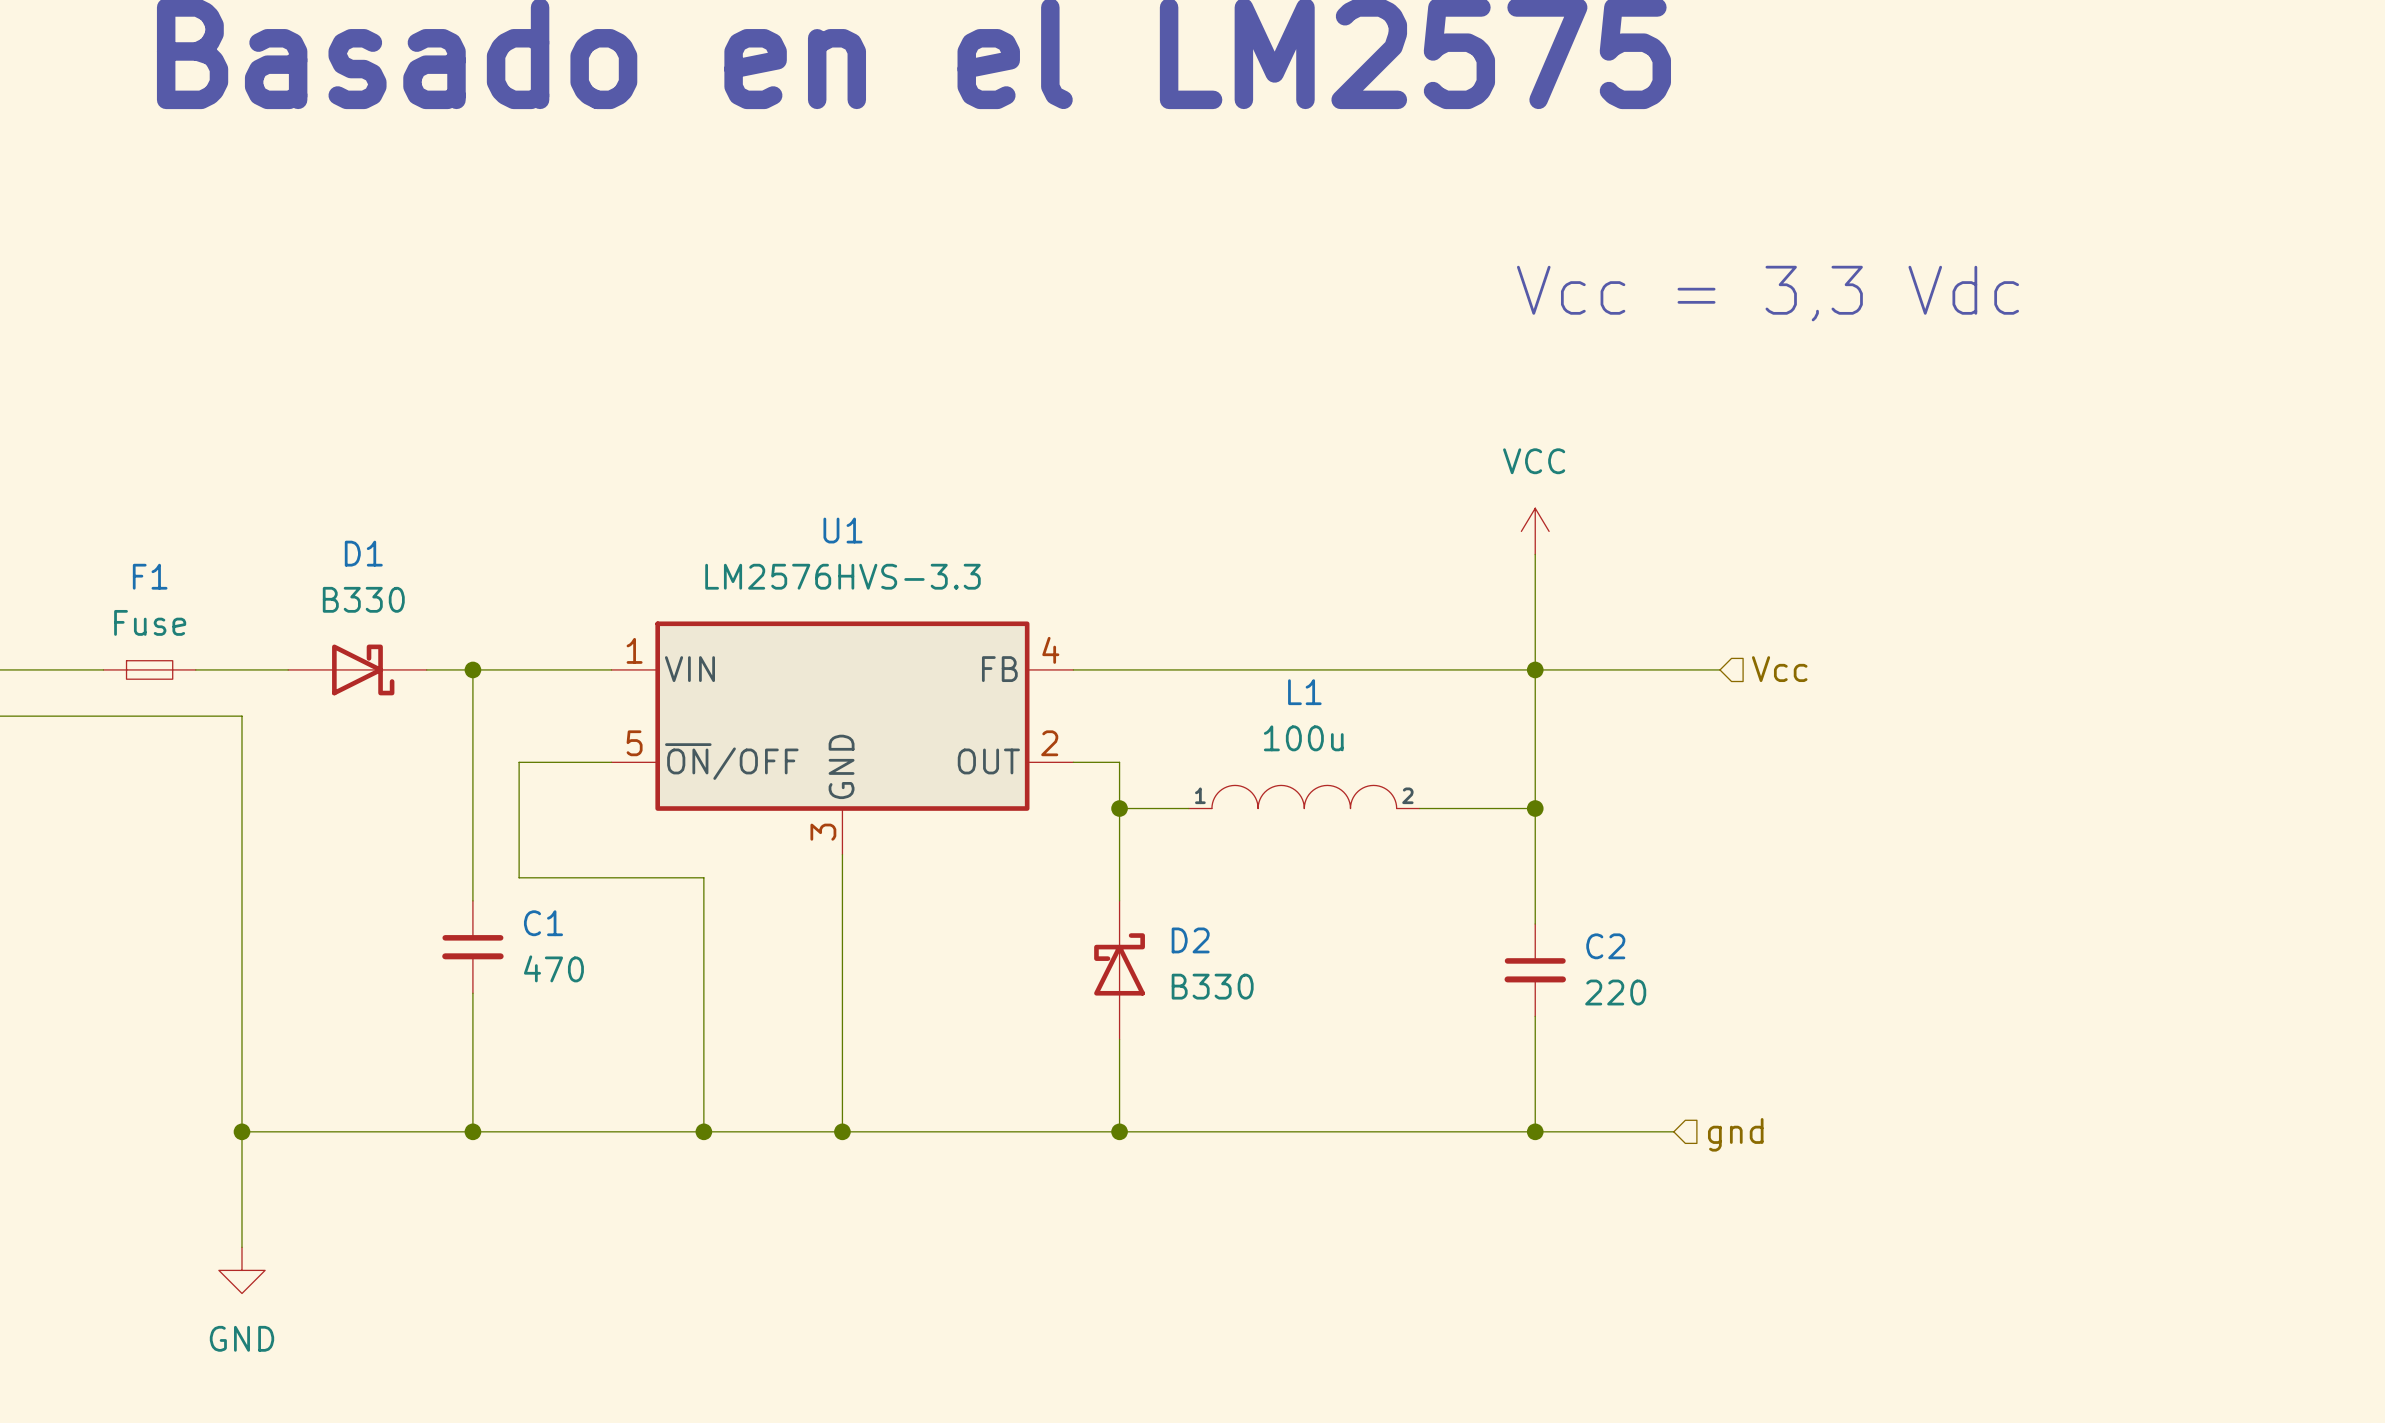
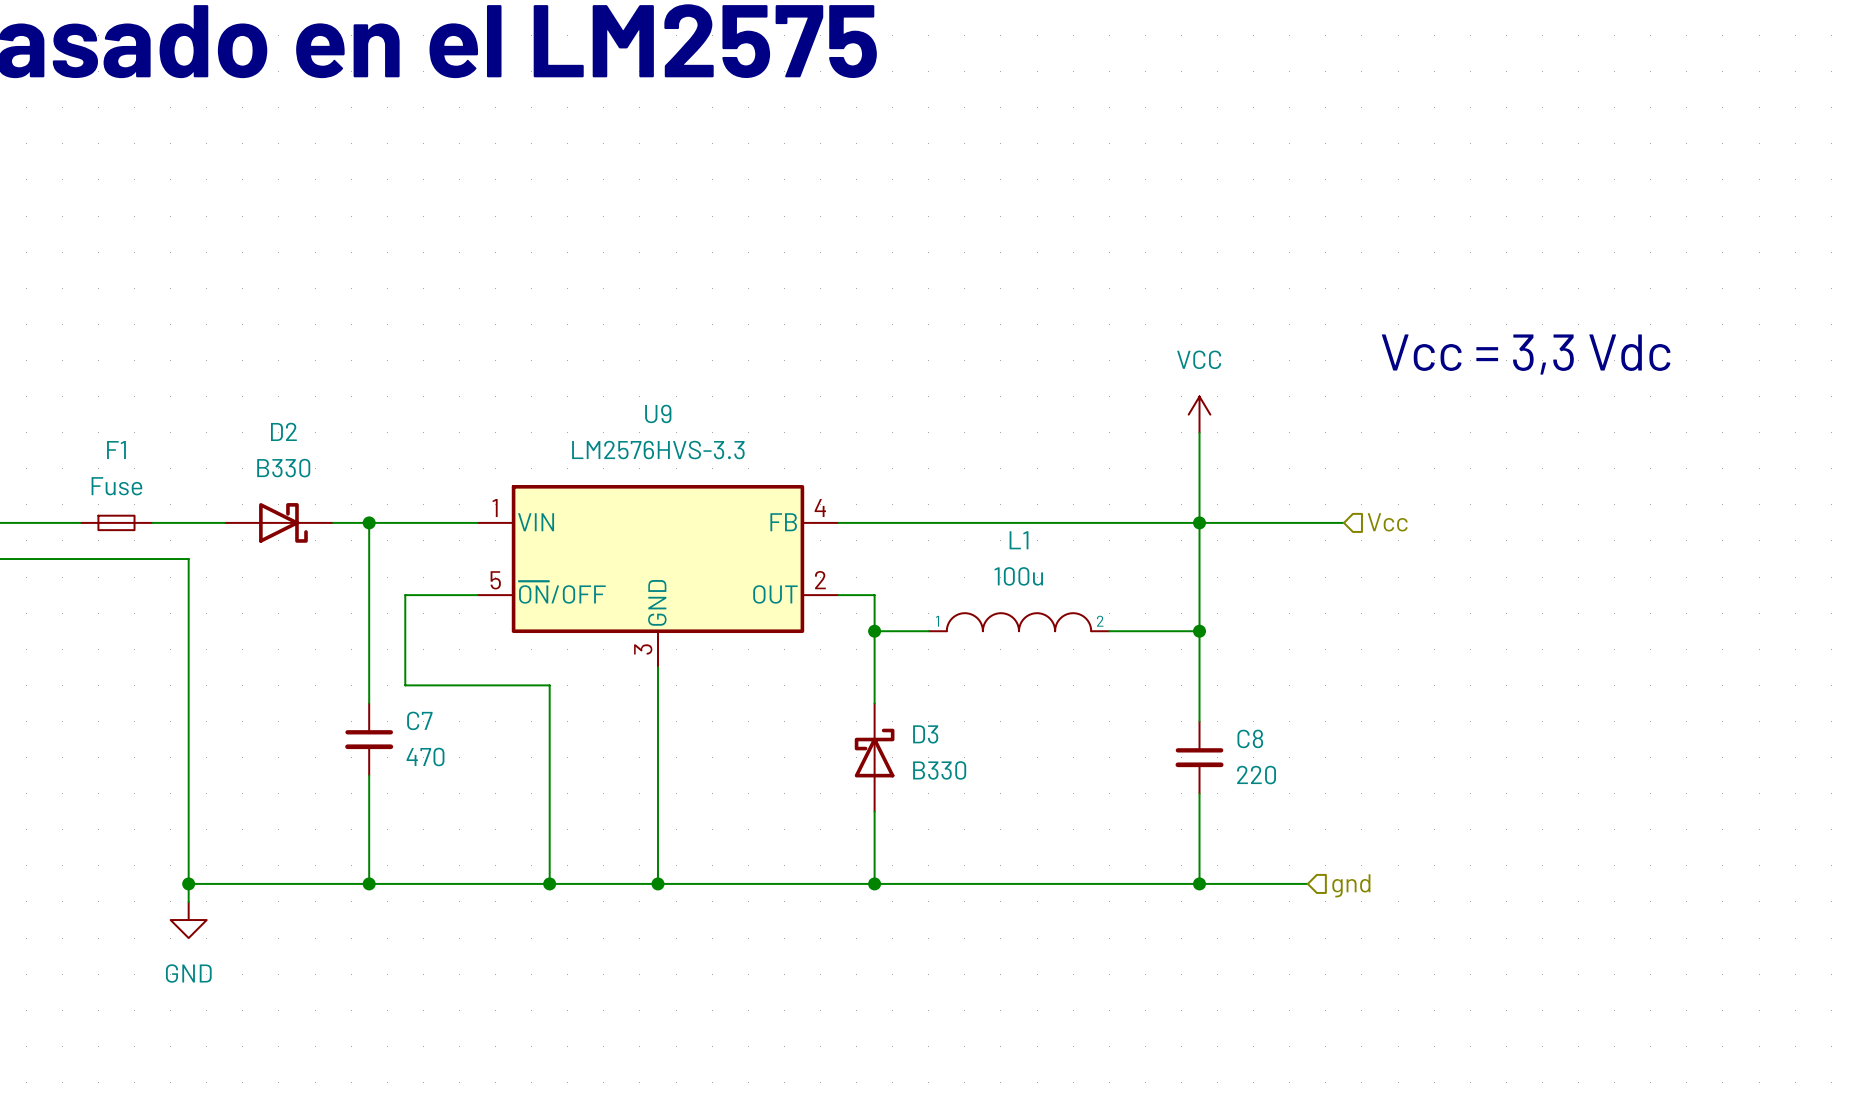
text position: Vcc = 3,3 Vdc (1768, 293) -> Vcc = 3,3 Vdc (1526, 354)
U1 name: U1 (842, 530) -> U9 (658, 413)
D1 name: D1 (363, 553) -> D2 (283, 431)
C1 name: C1 (543, 923) -> C7 (419, 720)
D2 name: D2 (1190, 940) -> D3 (925, 734)
C2 name: C2 (1605, 946) -> C8 (1250, 738)
wire: (241, 1154) (241, 1247) -> none
power symbol position: GND (241, 1270) -> GND (188, 920)

